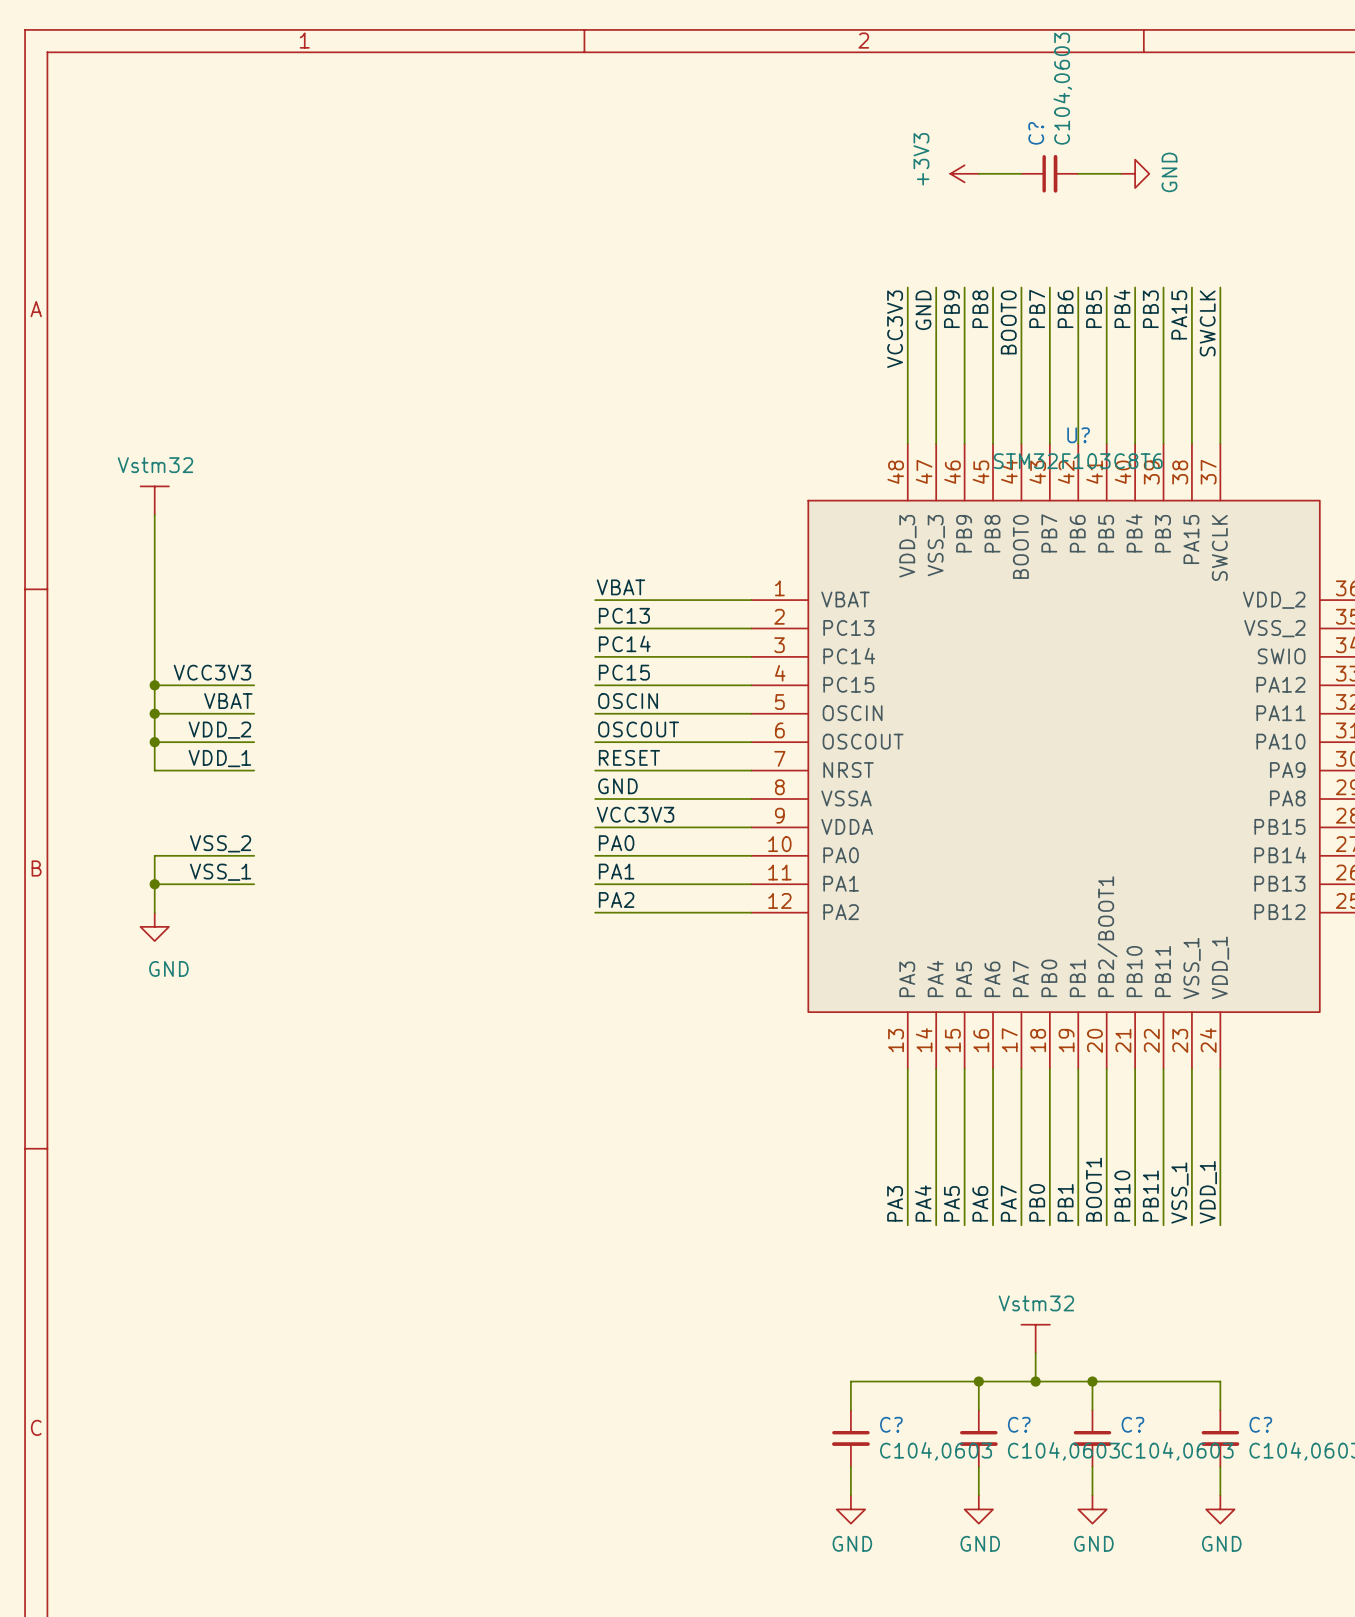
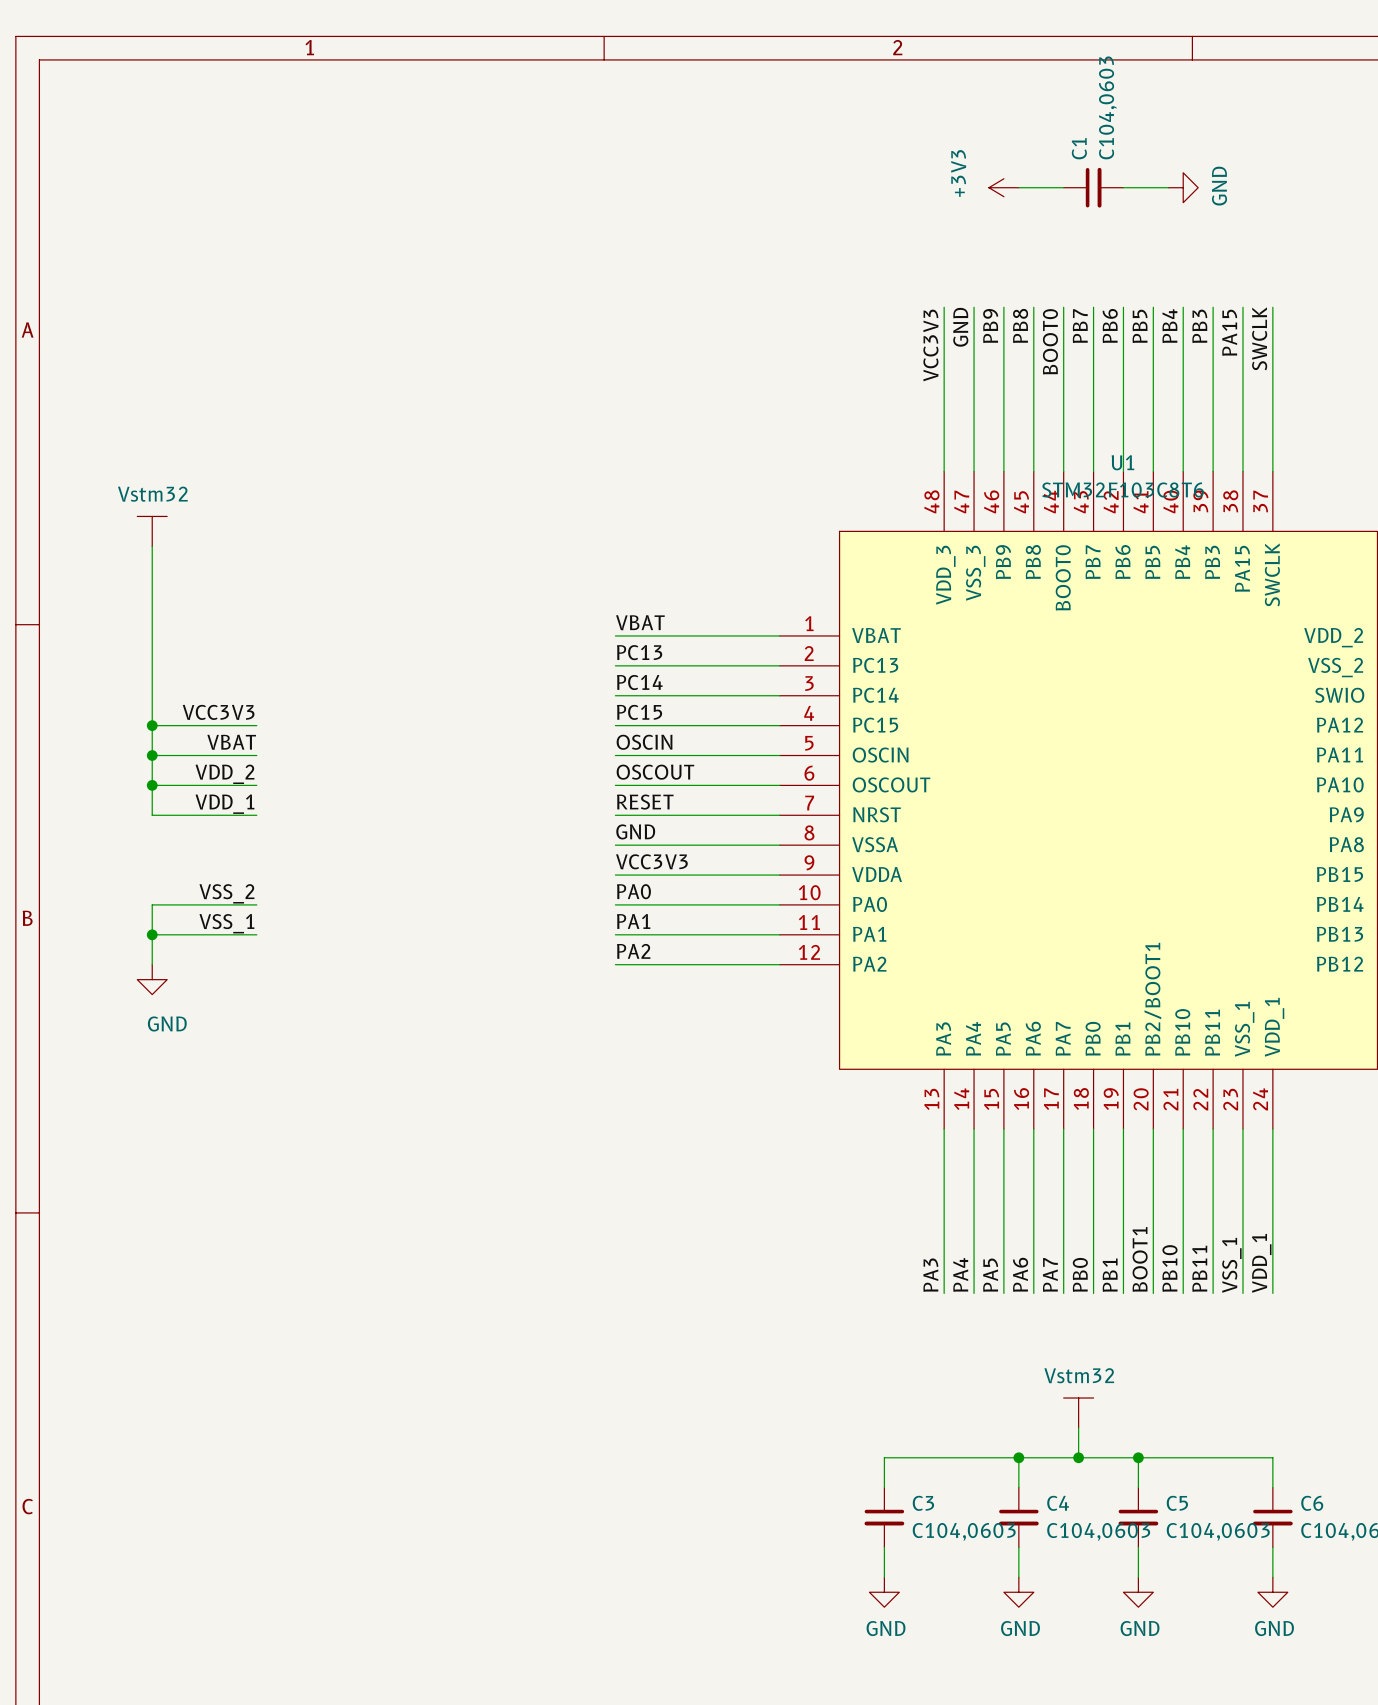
C? name: C? (1036, 133) -> C1 (1079, 148)
U? name: U? (1078, 435) -> U1 (1122, 462)
C? name: C? (891, 1424) -> C3 (923, 1503)
C? name: C? (1019, 1424) -> C4 (1058, 1503)
C? name: C? (1132, 1424) -> C5 (1177, 1503)
C? name: C? (1260, 1424) -> C6 (1312, 1503)

